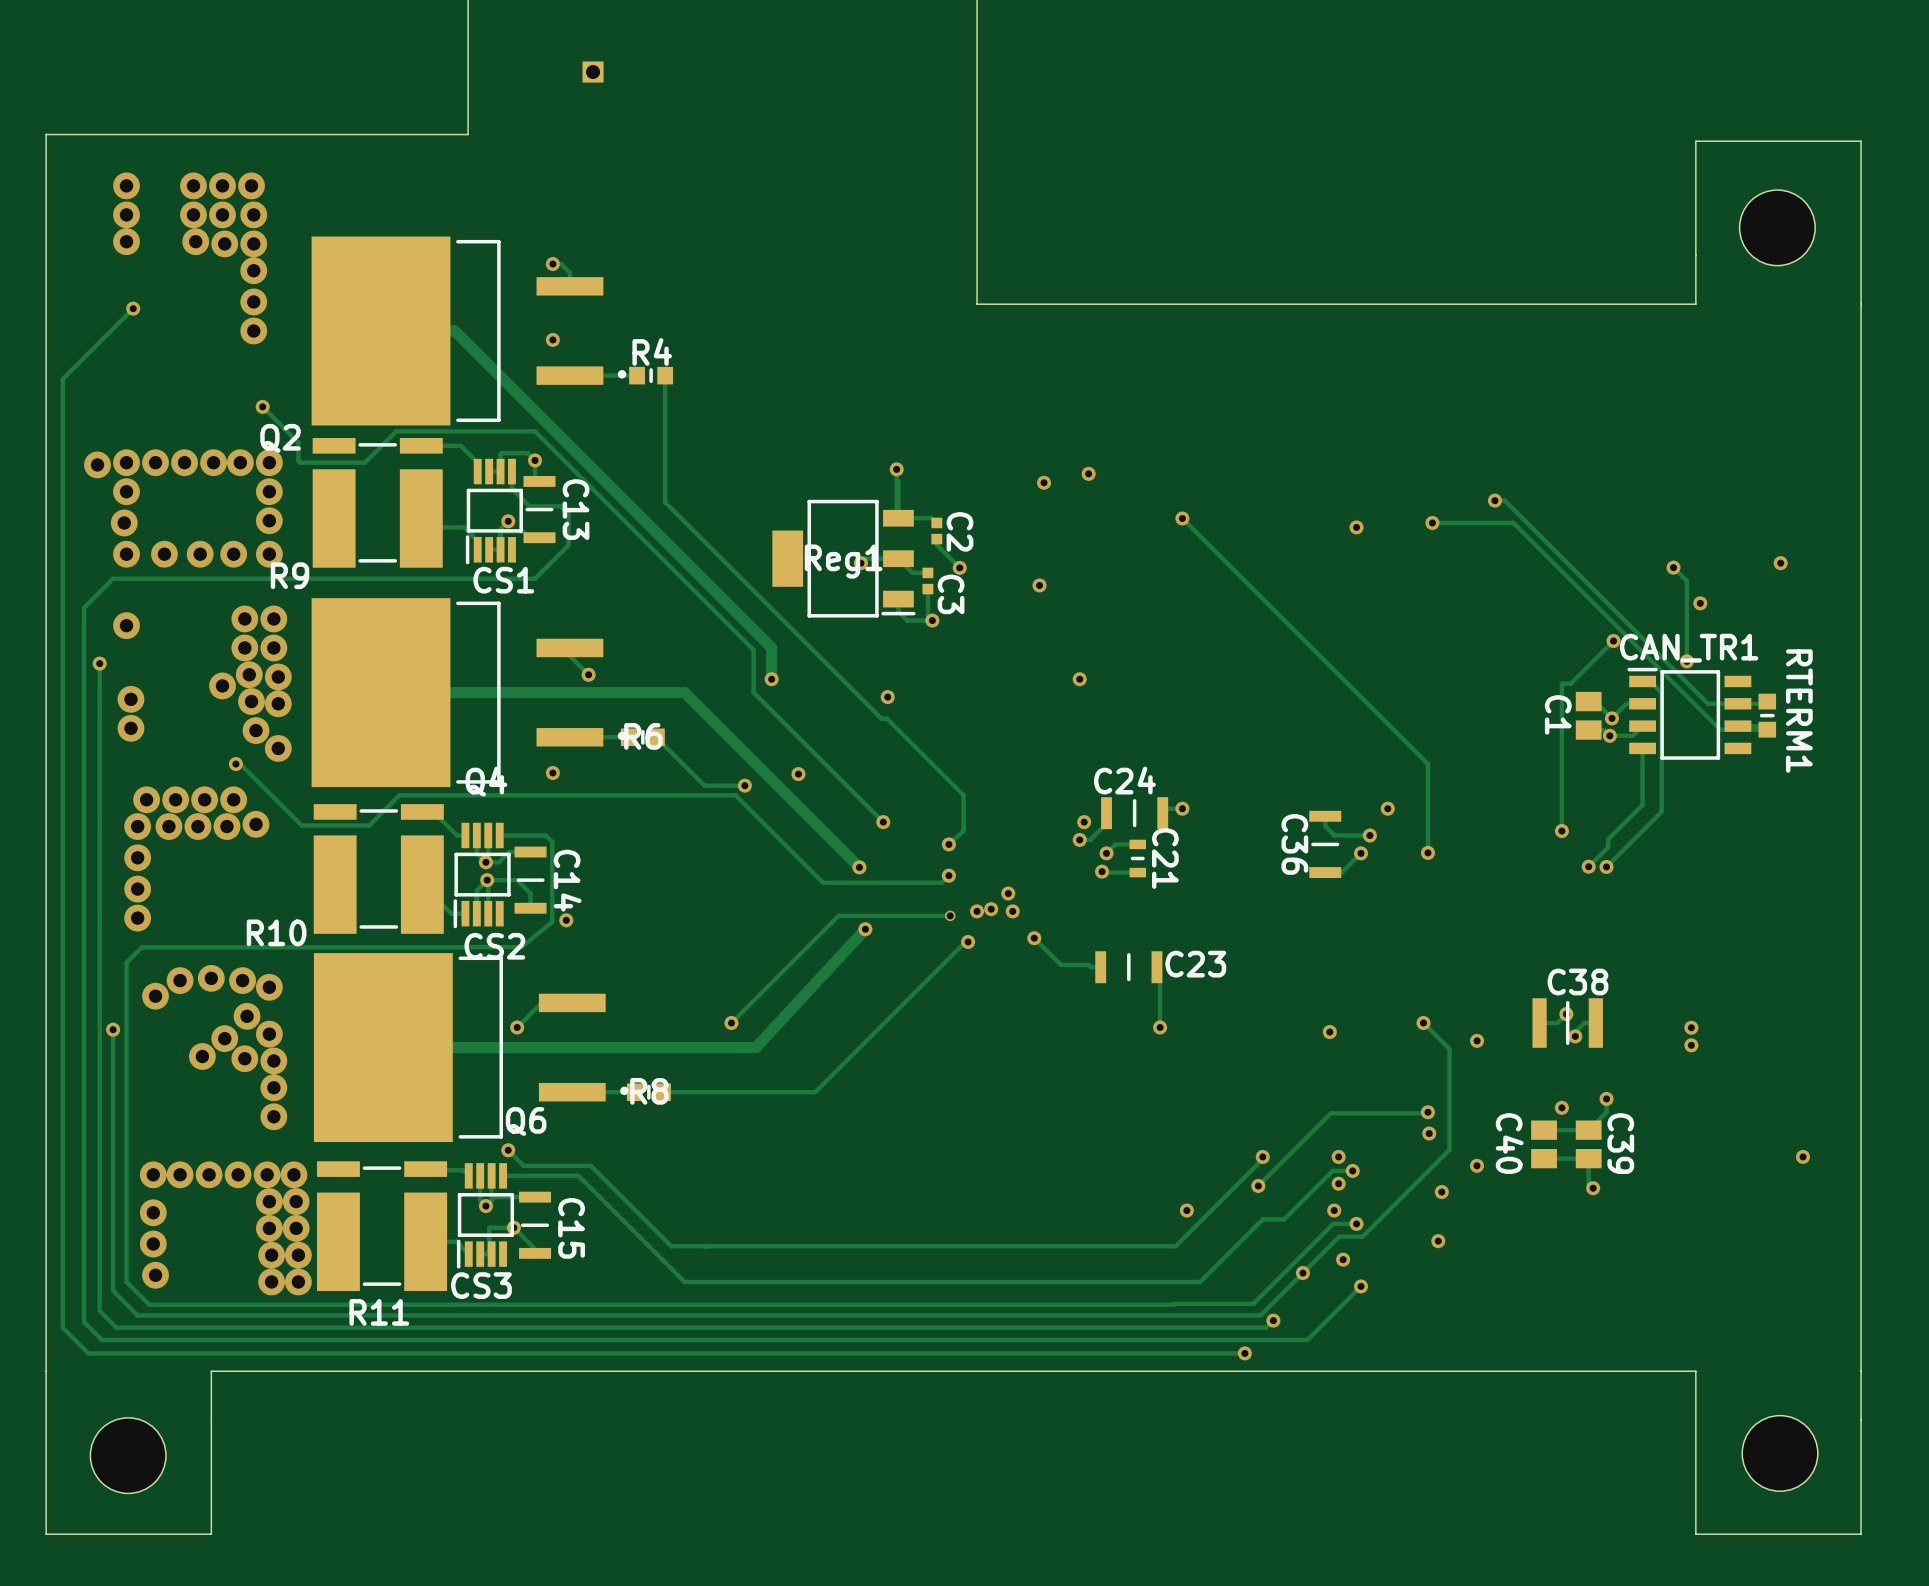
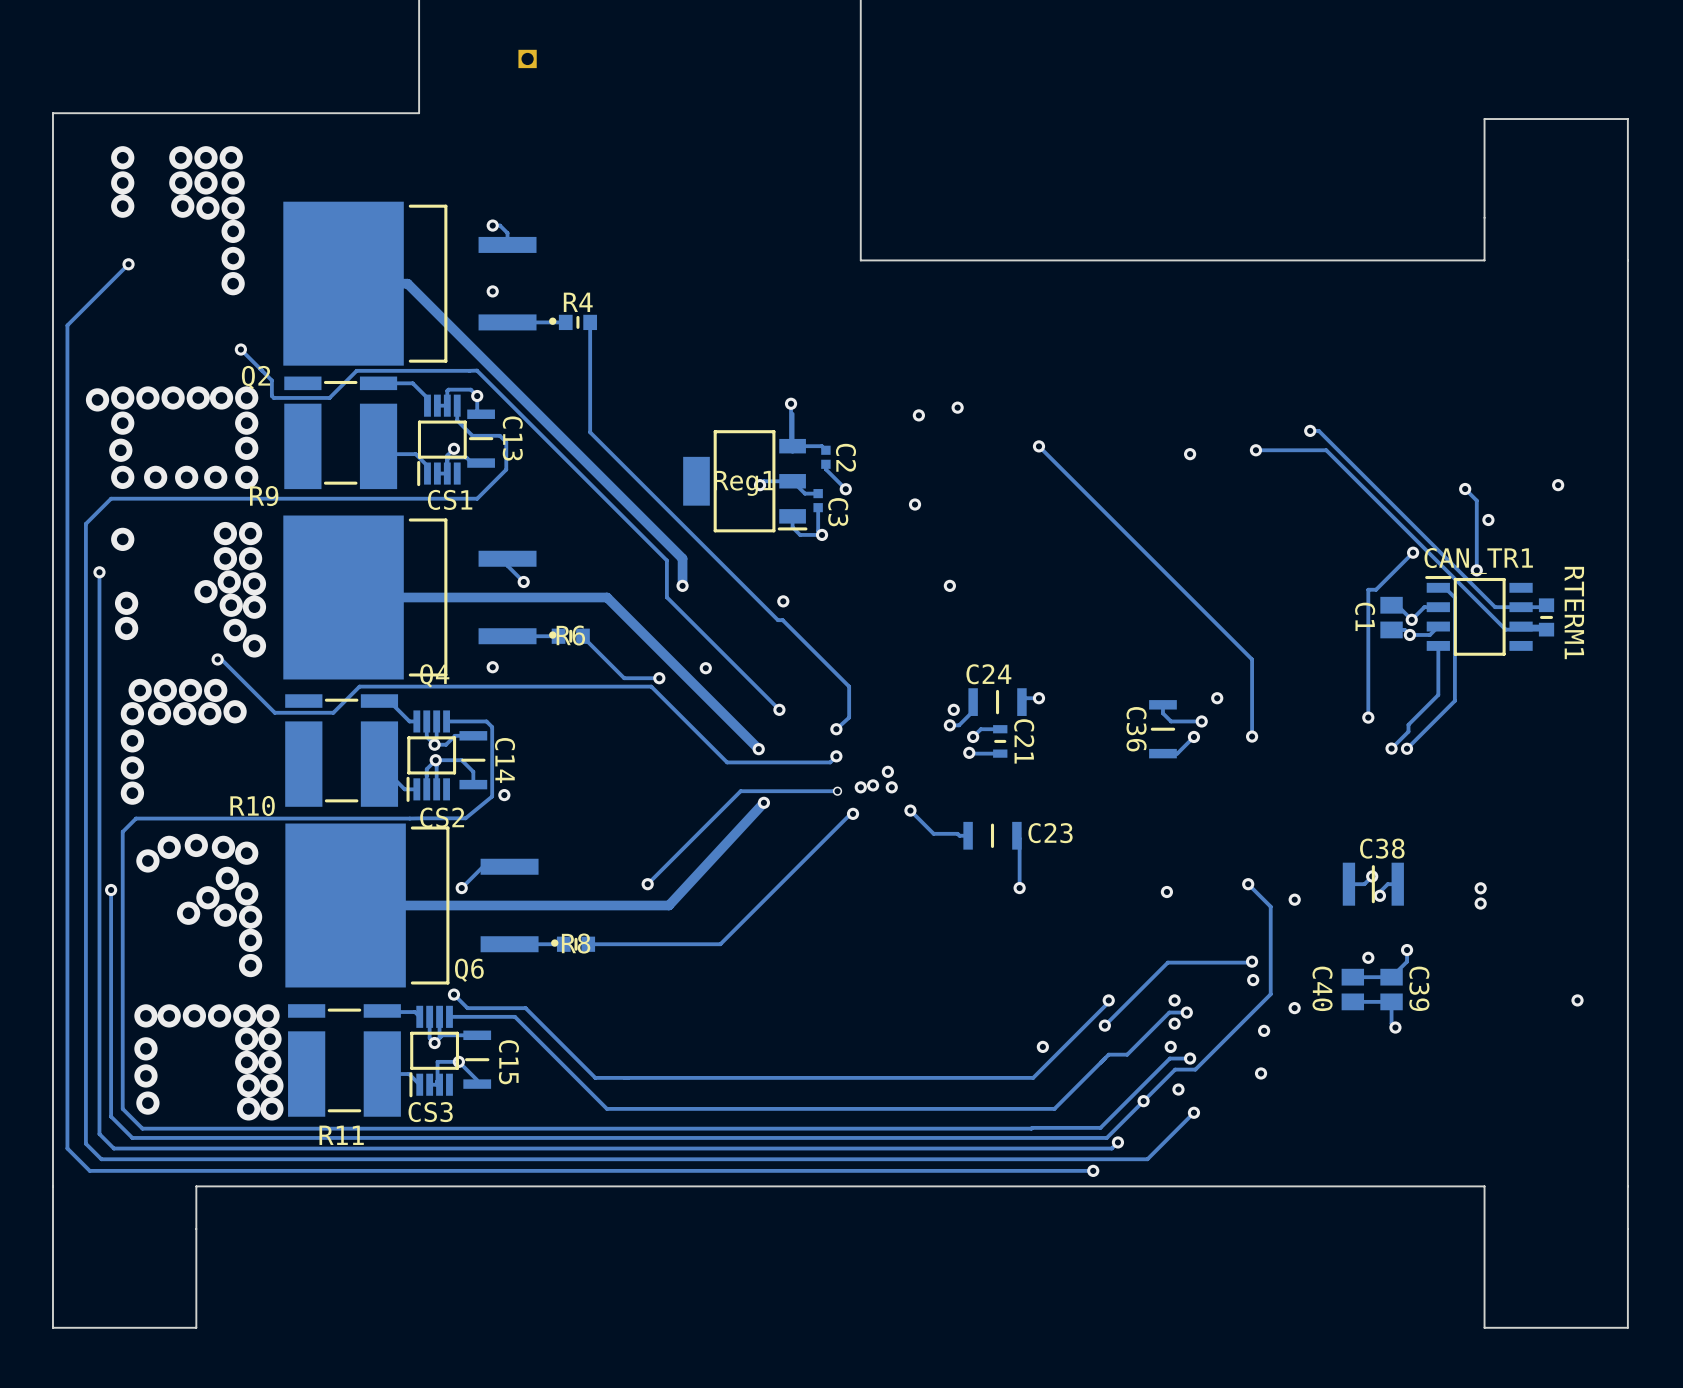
part: (1777, 227) -> none
part: (1780, 1453) -> none
part: (128, 1455) -> none

